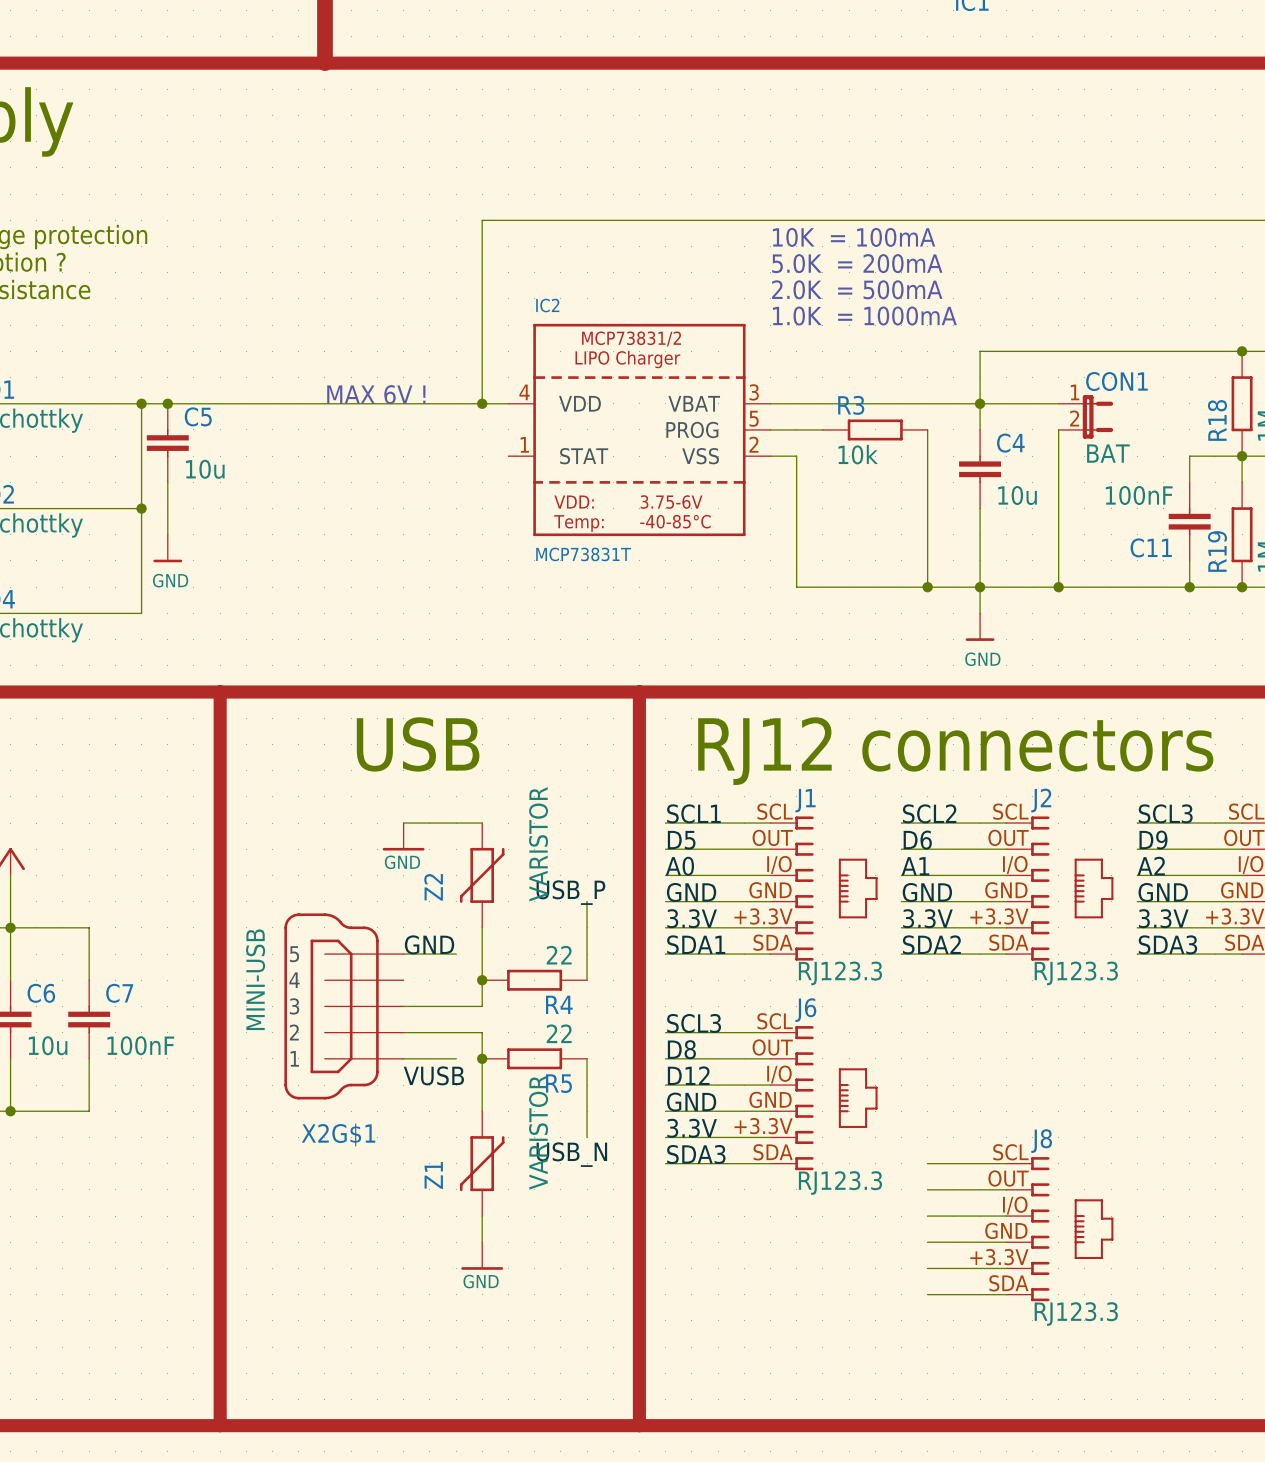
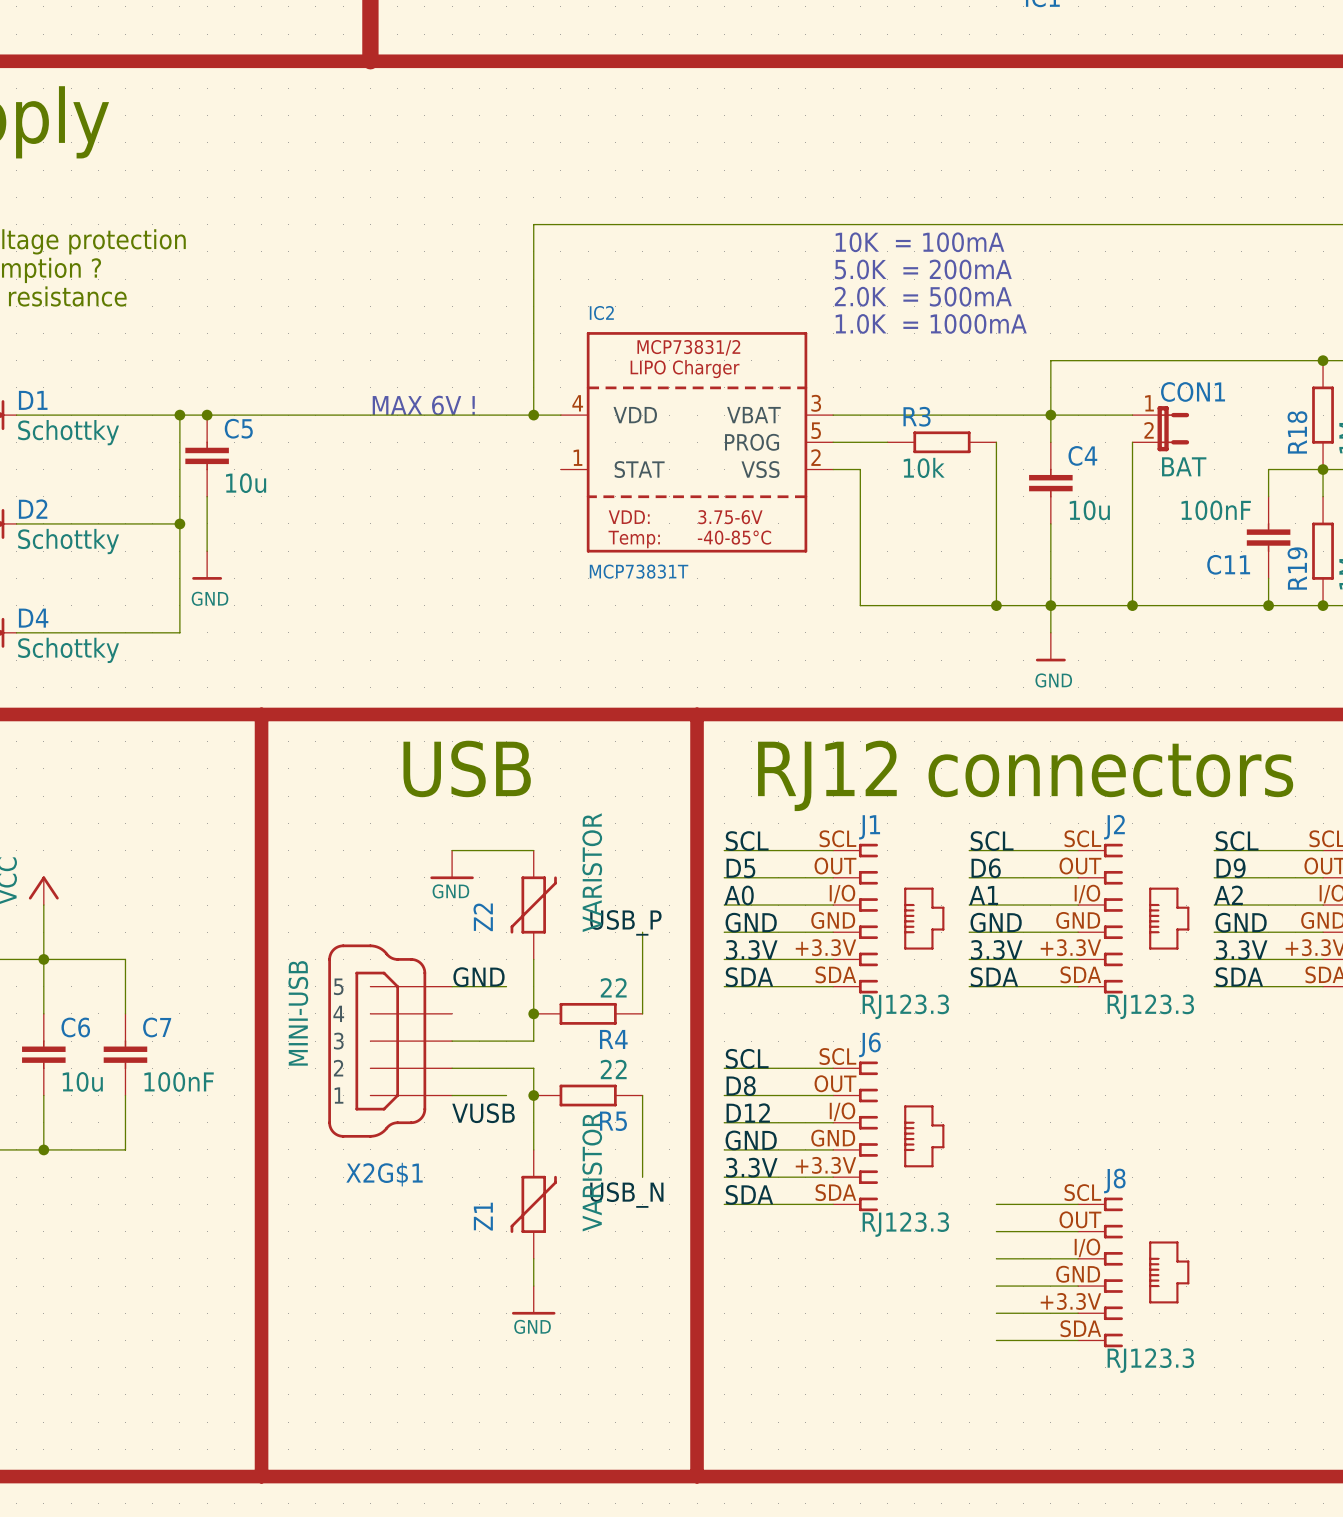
label: SCL1 (693, 813) -> SCL (747, 841)
label: SCL2 (929, 813) -> SCL (992, 841)
label: SCL3 (1165, 813) -> SCL (1237, 841)
label: SDA1 (696, 944) -> SDA (749, 977)
label: SDA2 (931, 944) -> SDA (994, 977)
label: SDA3 (1167, 944) -> SDA (1239, 977)
label: SCL3 (694, 1023) -> SCL (747, 1058)
label: SDA3 (696, 1154) -> SDA (749, 1194)

